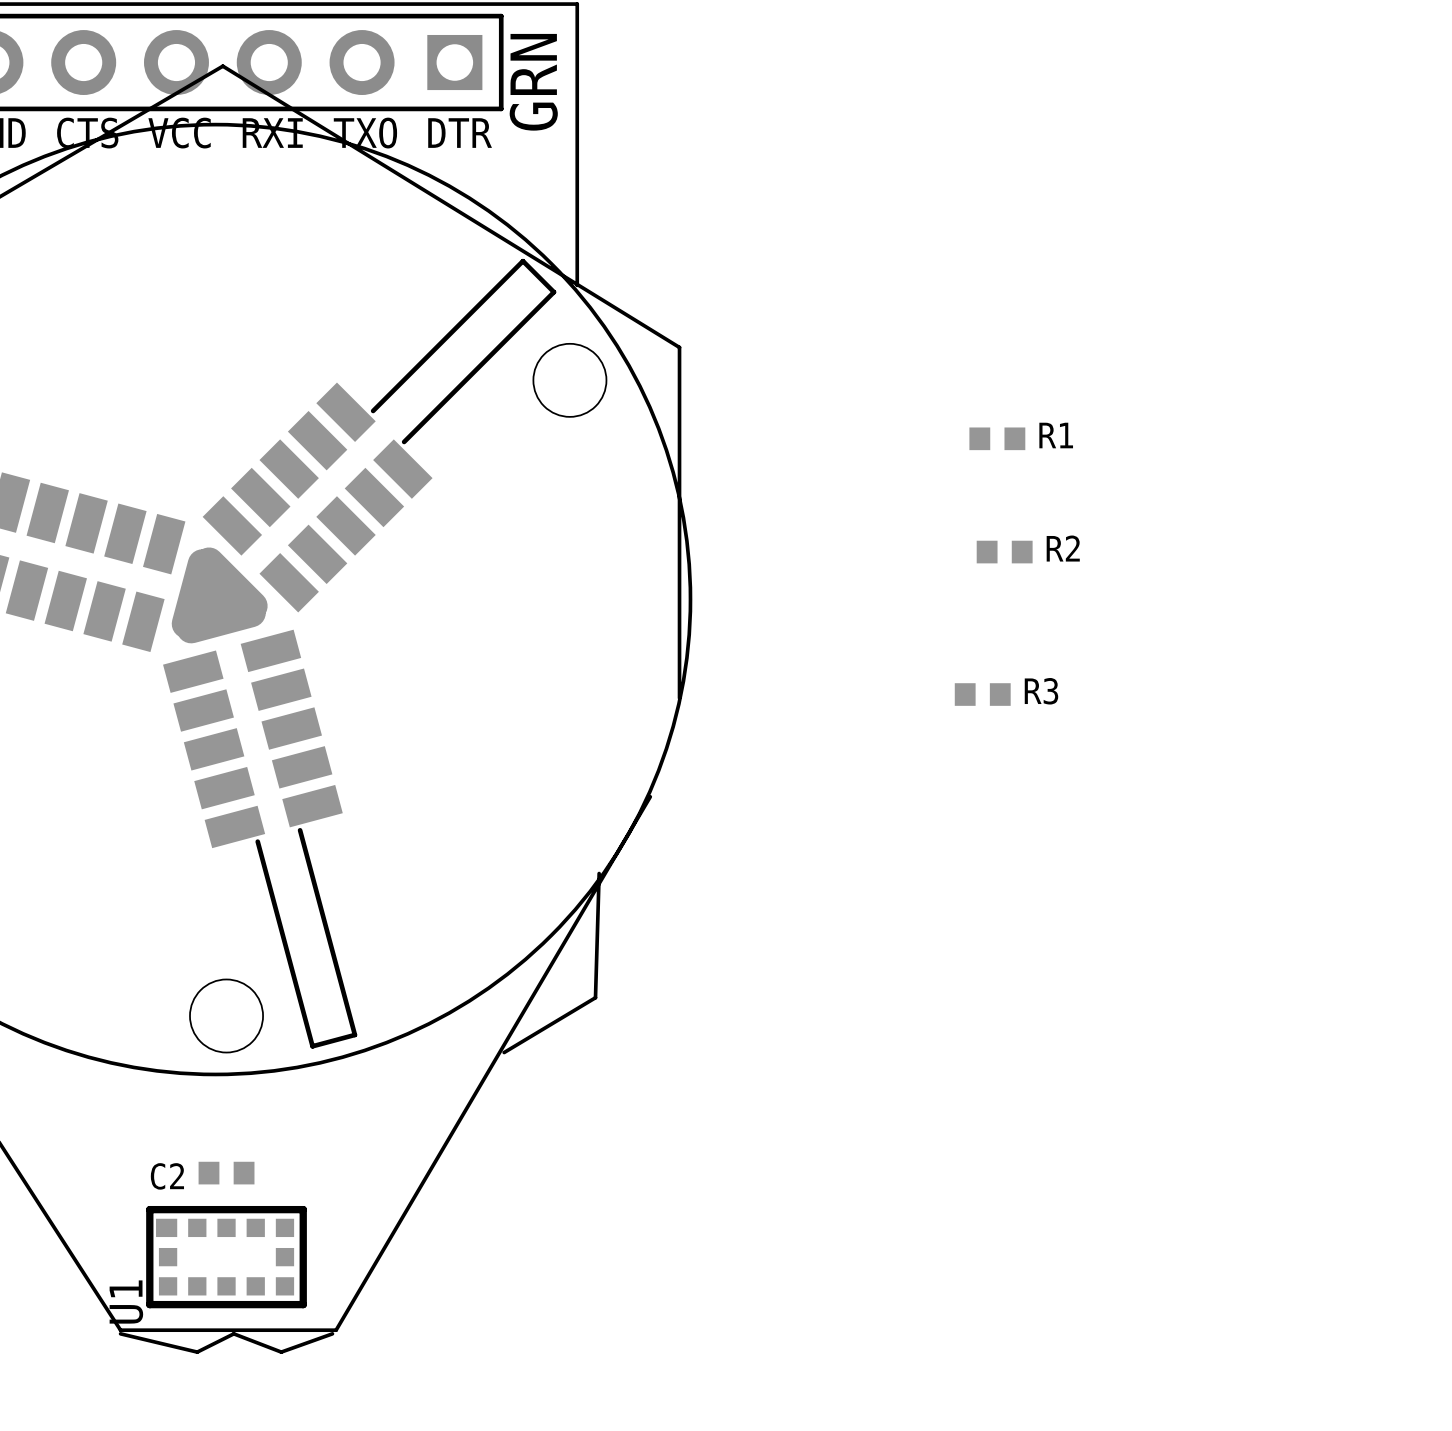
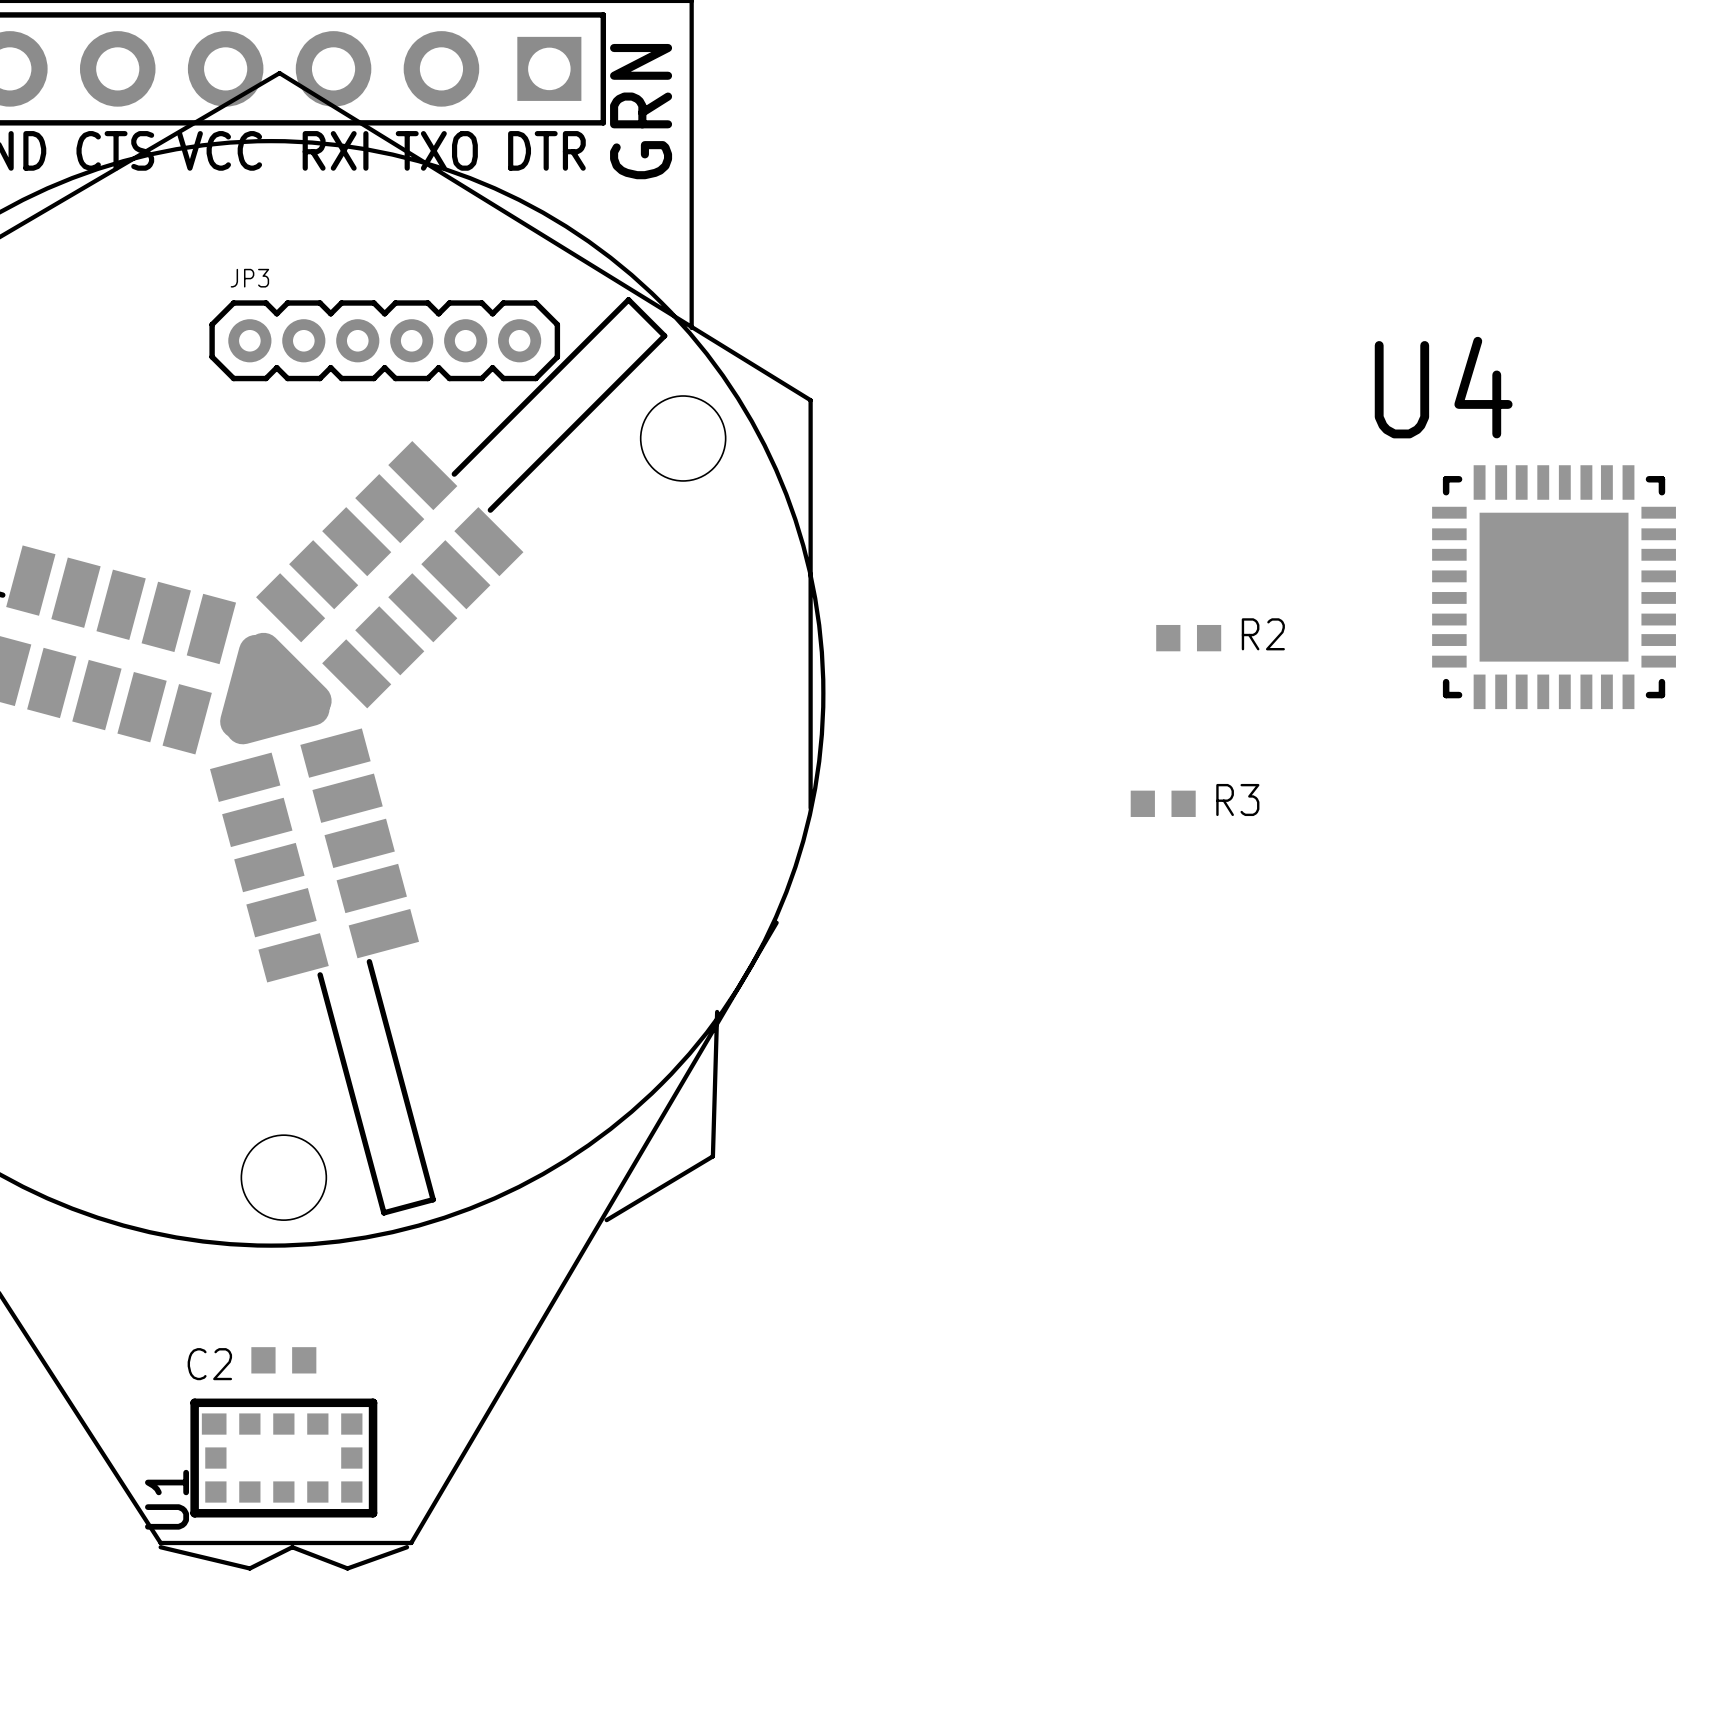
JP3: none -> (384, 340)
R1: (997, 438) -> none
U4: none -> (1554, 587)

